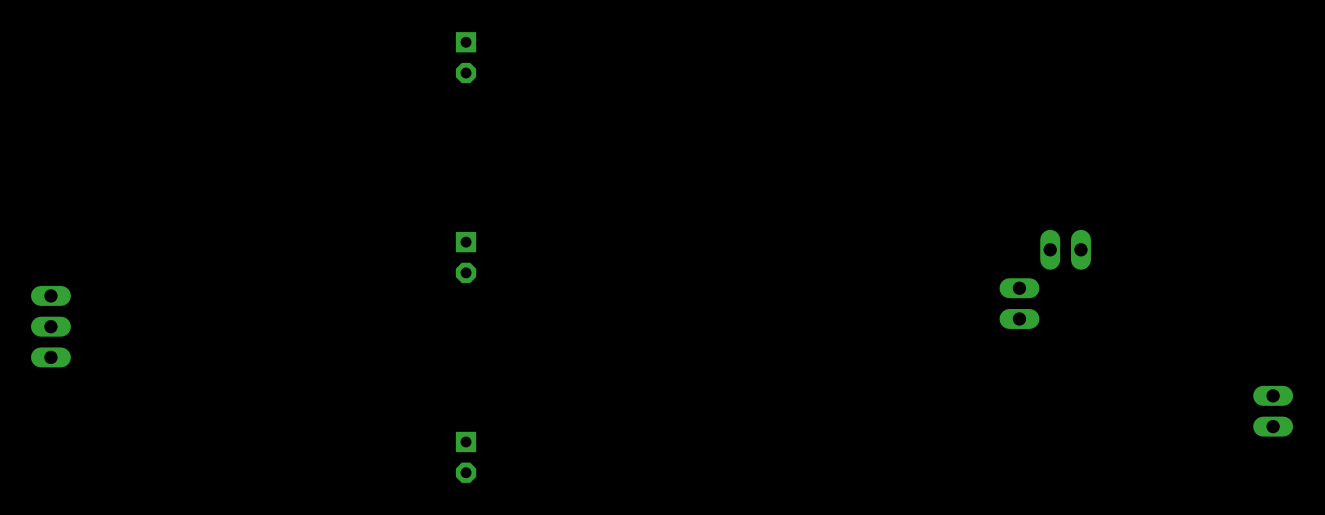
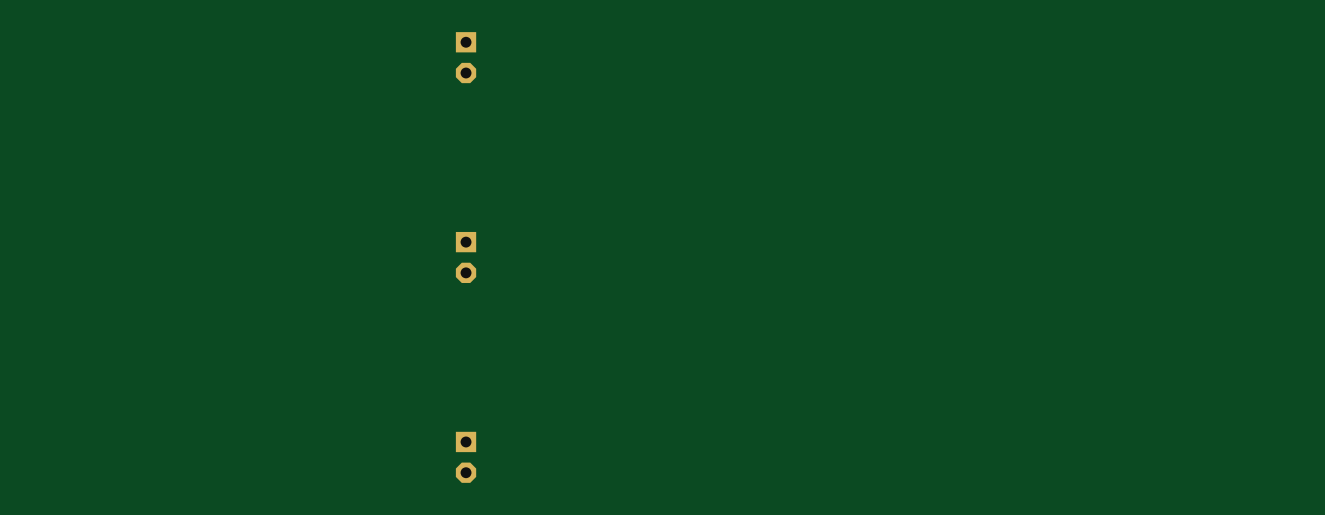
part: (1065, 249) -> none
part: (1019, 303) -> none
part: (50, 326) -> none
part: (1273, 411) -> none

